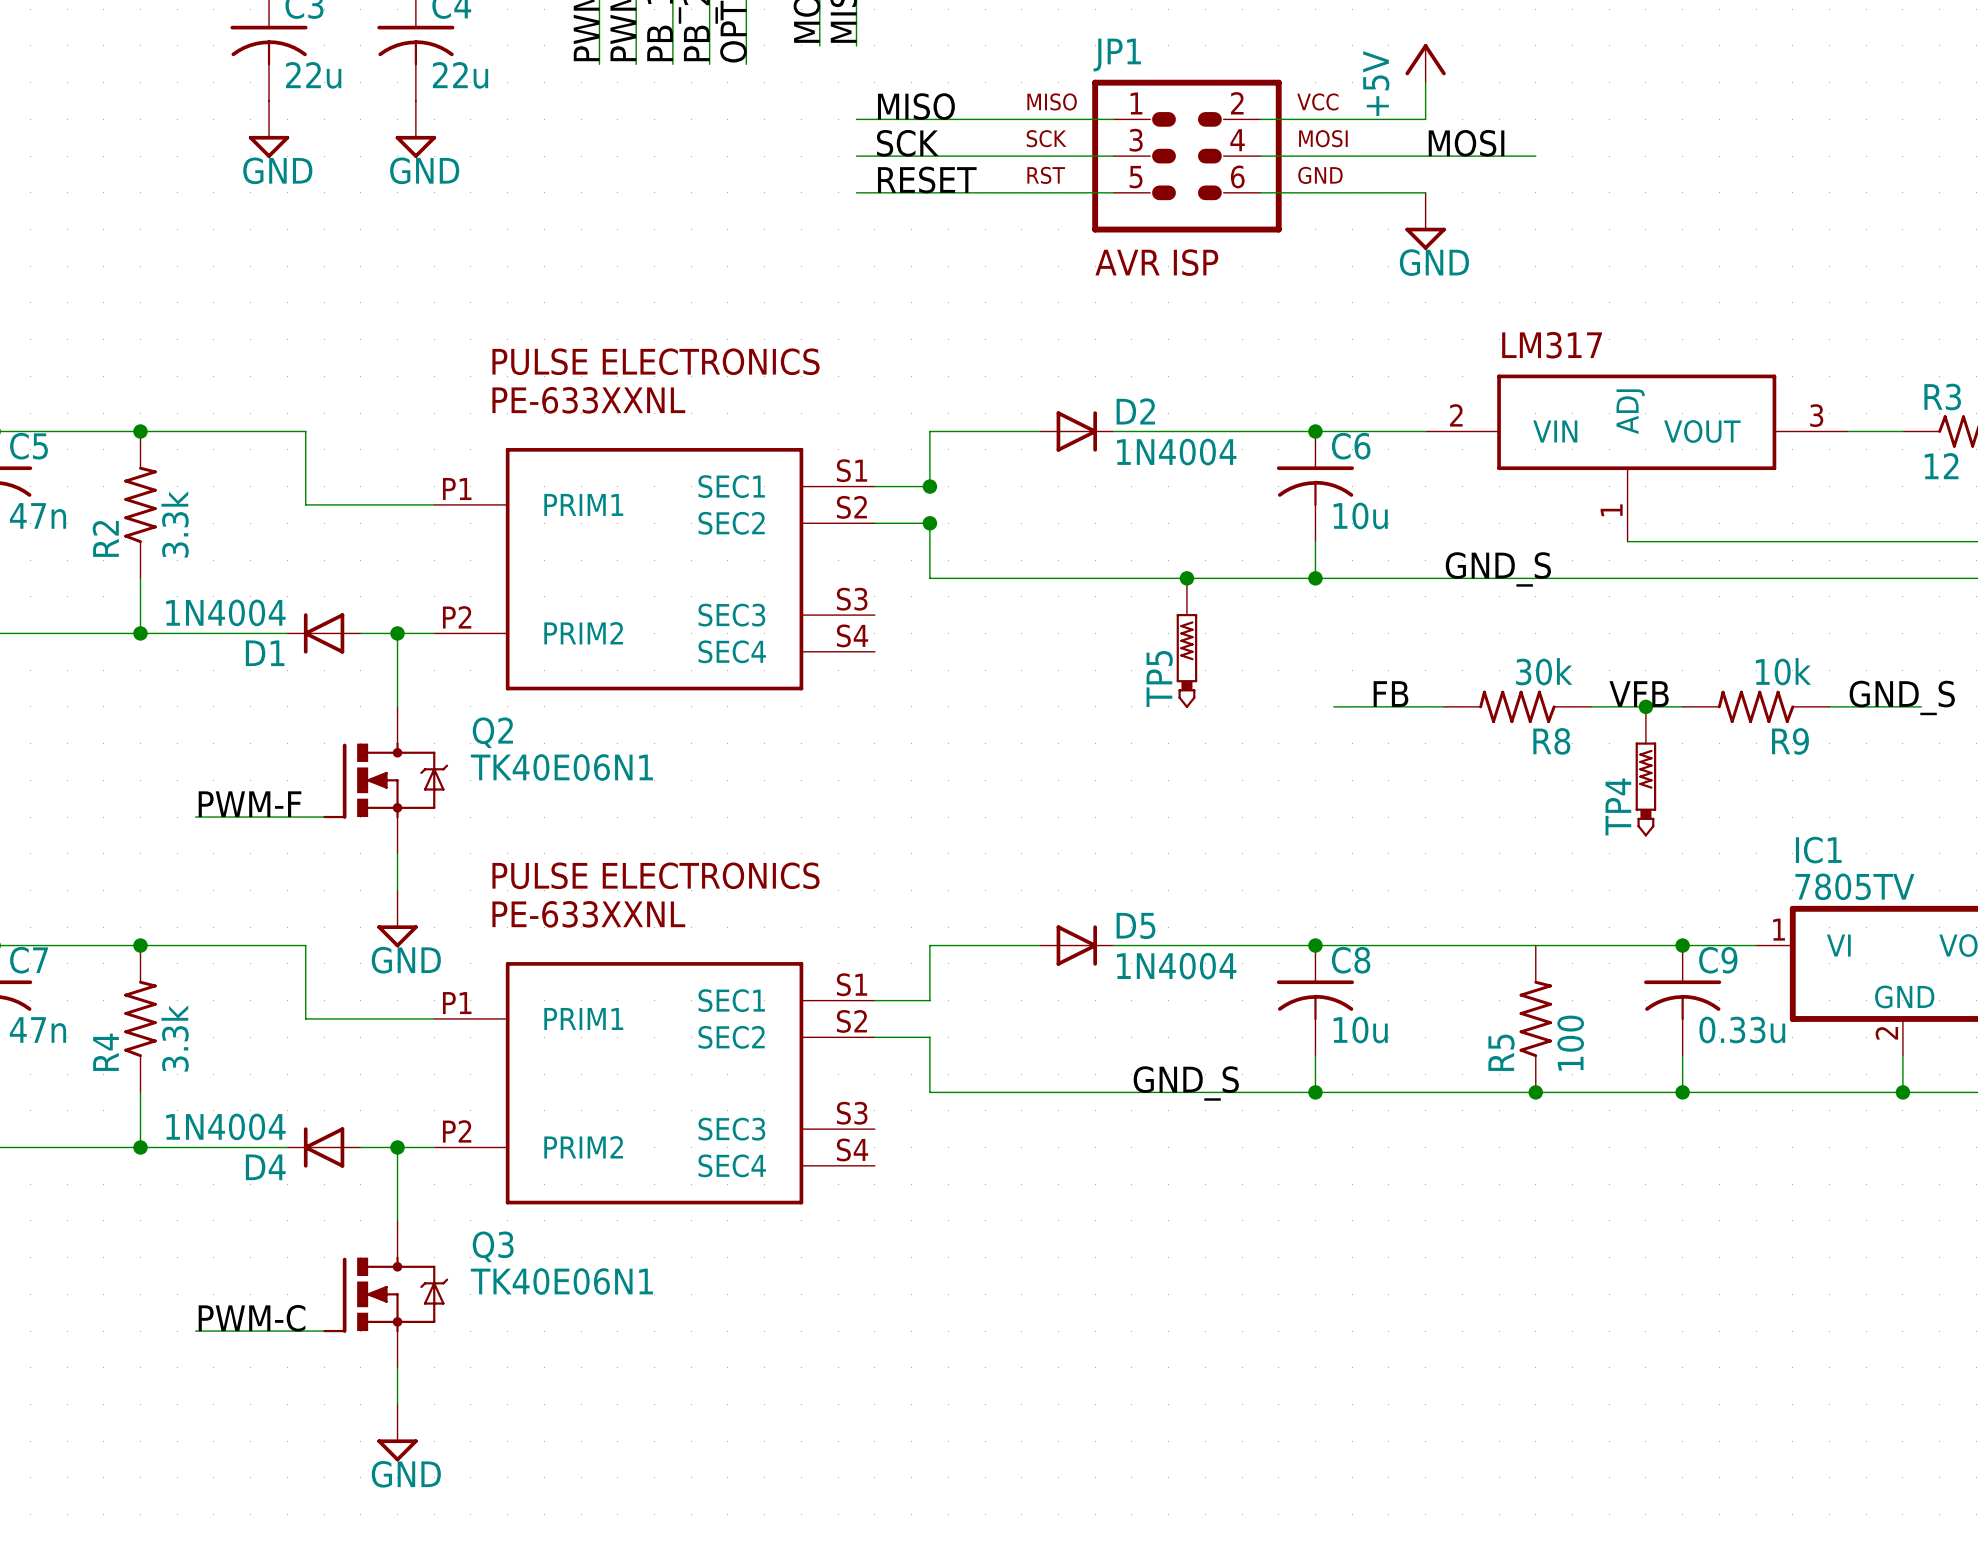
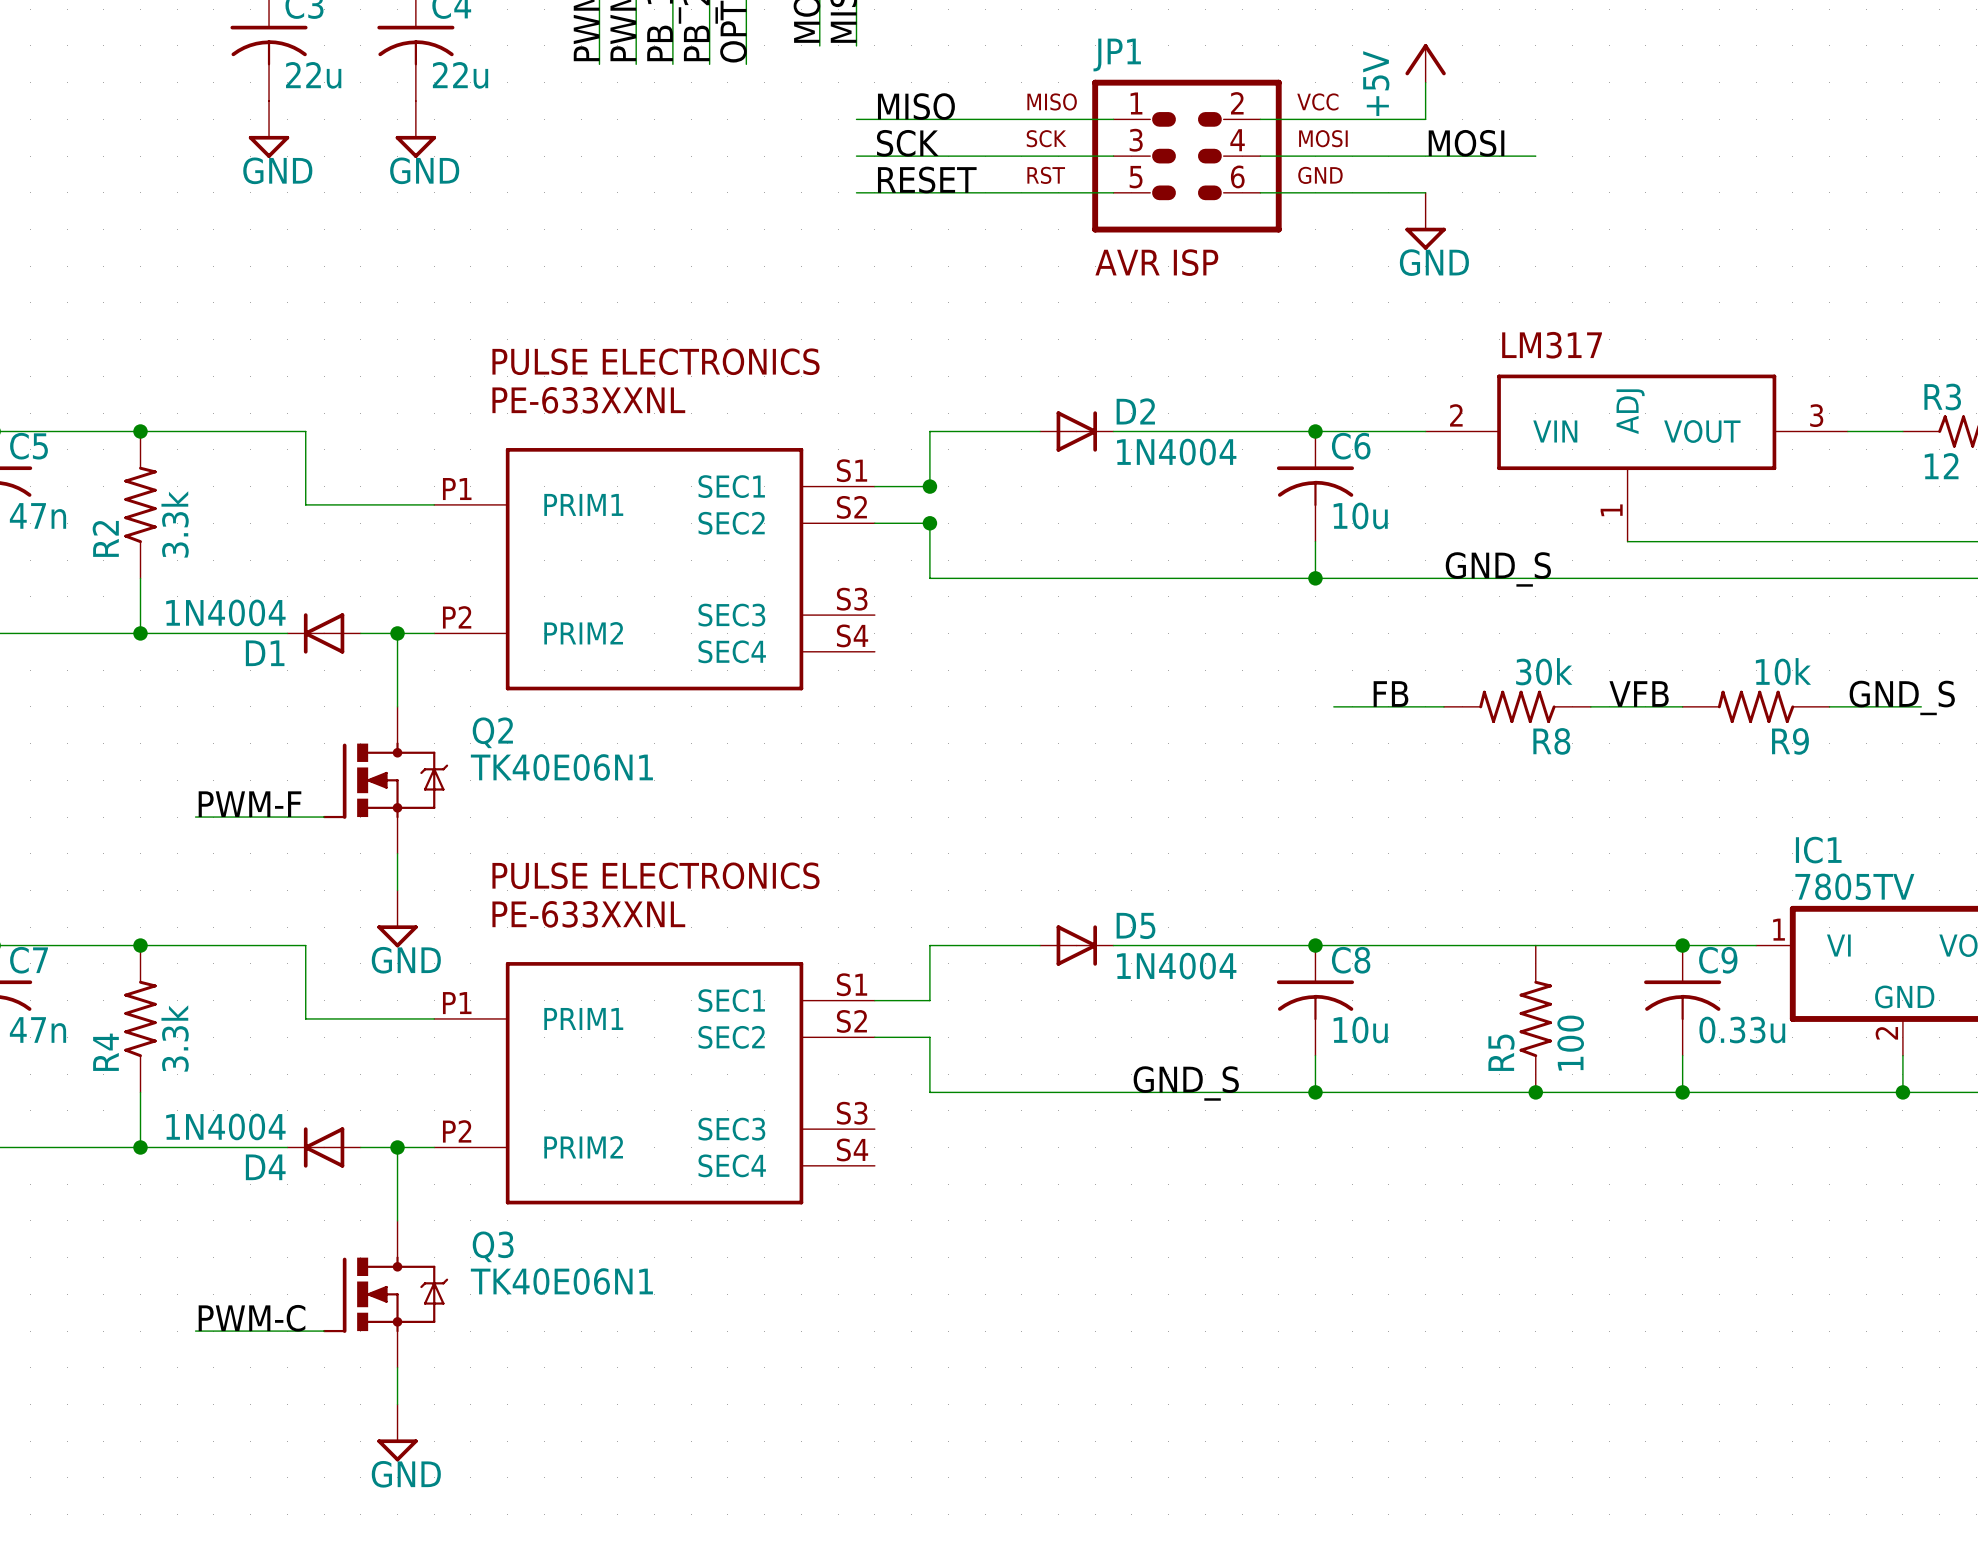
junction: (1186, 578) -> none
TP5: (1186, 643) -> none
junction: (1645, 706) -> none
TP4: (1645, 771) -> none

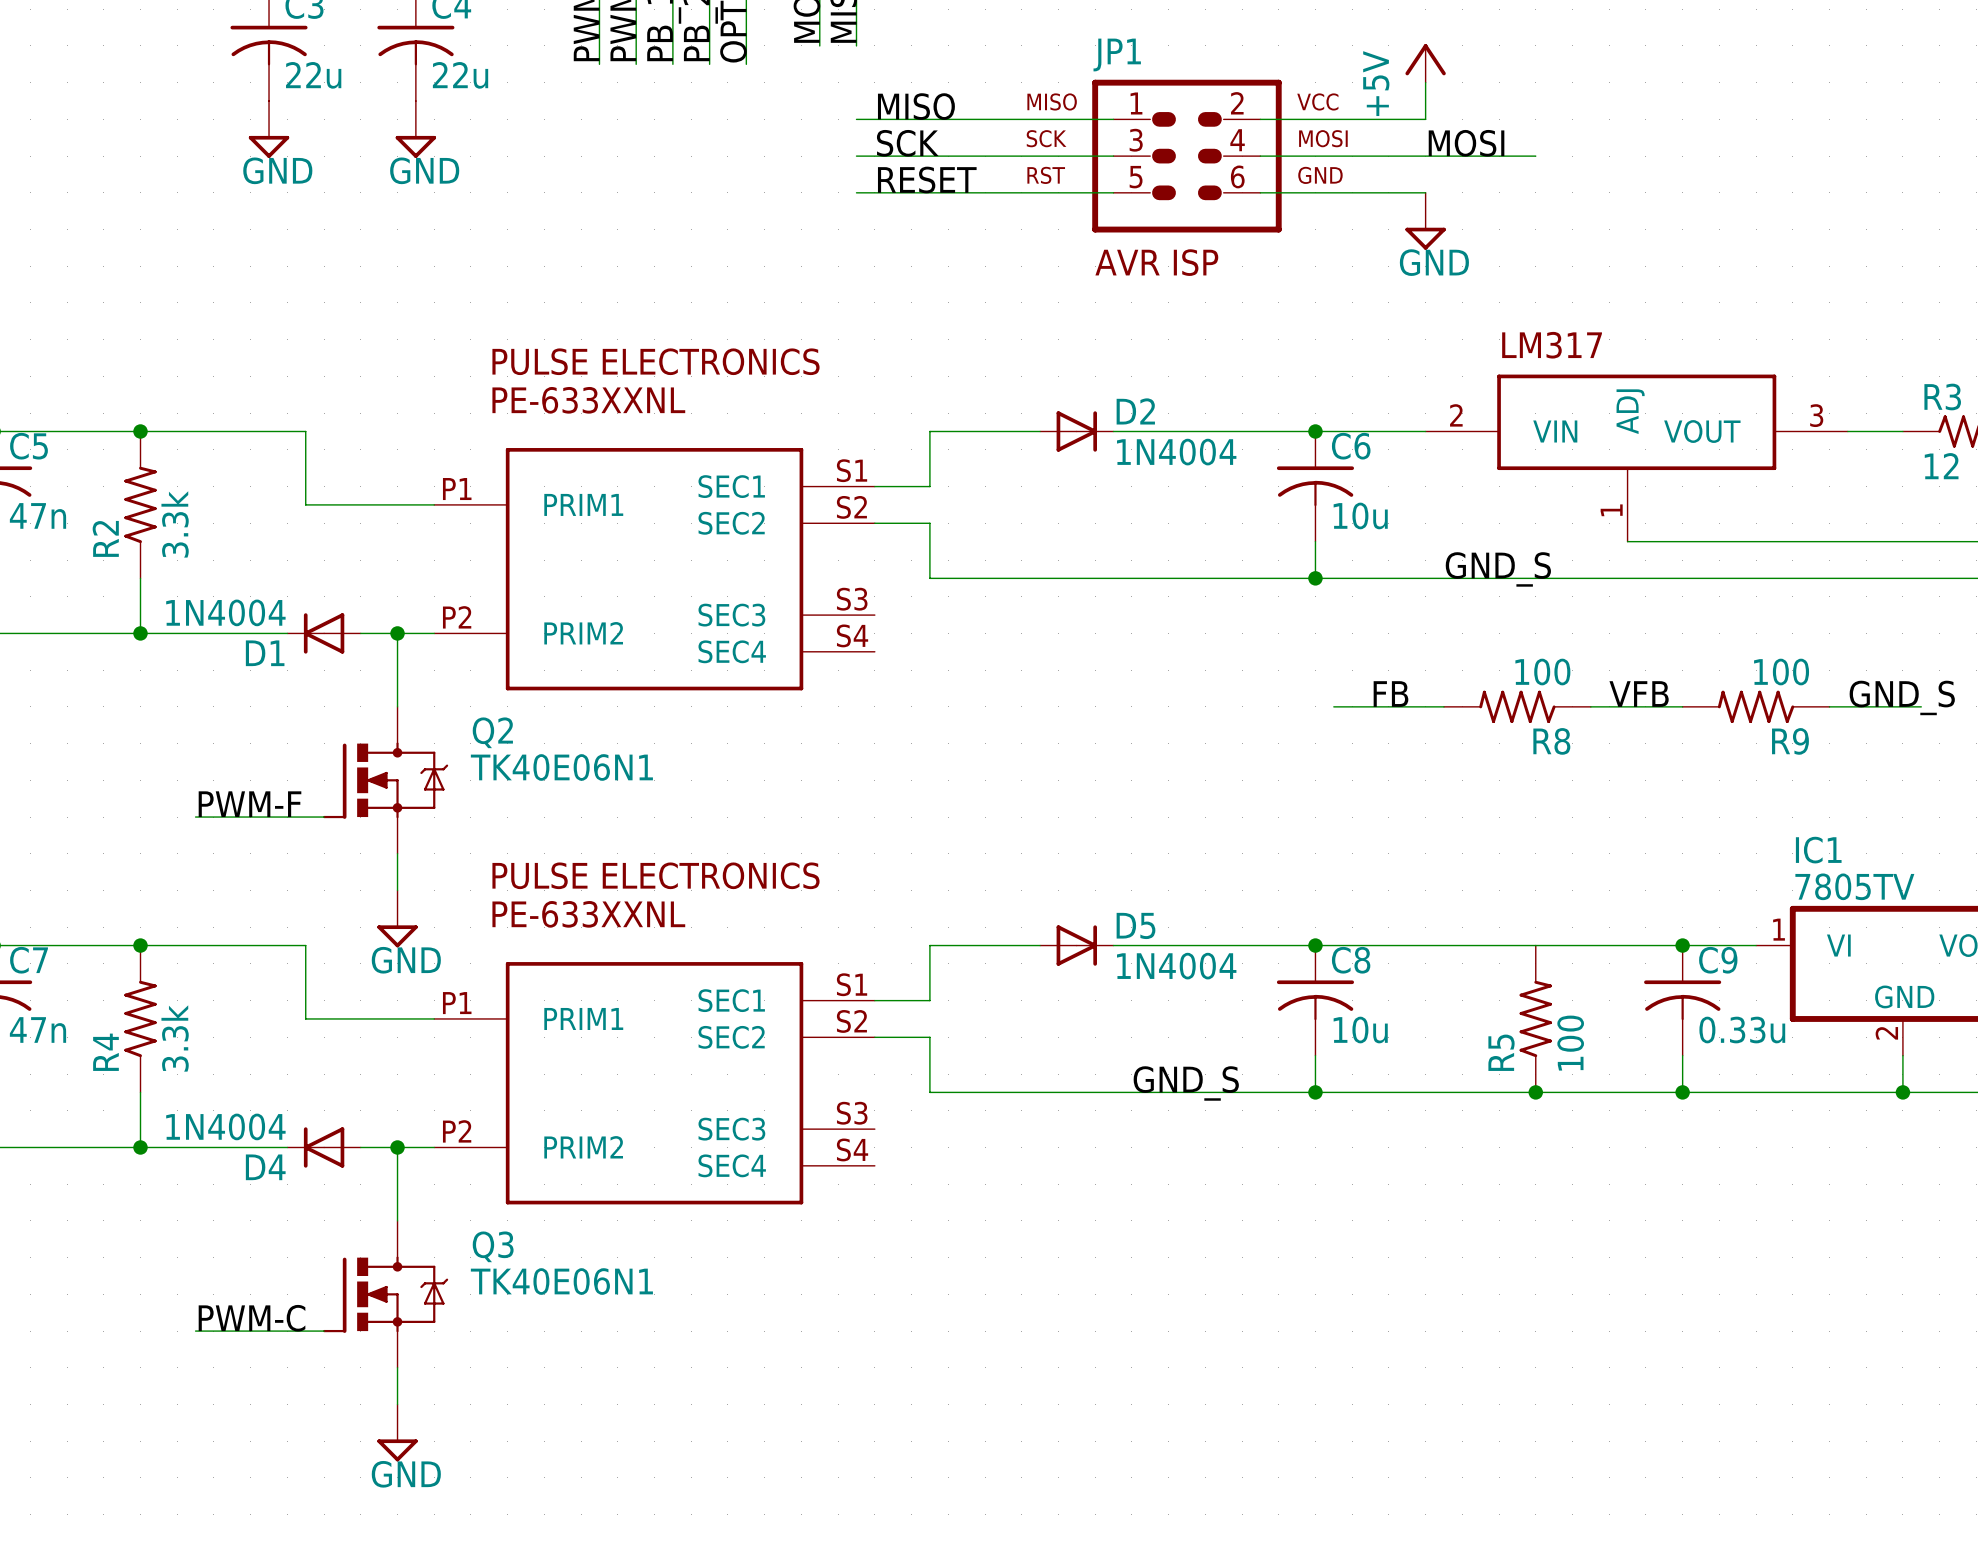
junction: (929, 486) -> none
junction: (929, 523) -> none
R8 value: 30k (1544, 671) -> 100 (1542, 672)
R9 value: 10k (1783, 671) -> 100 (1781, 672)

